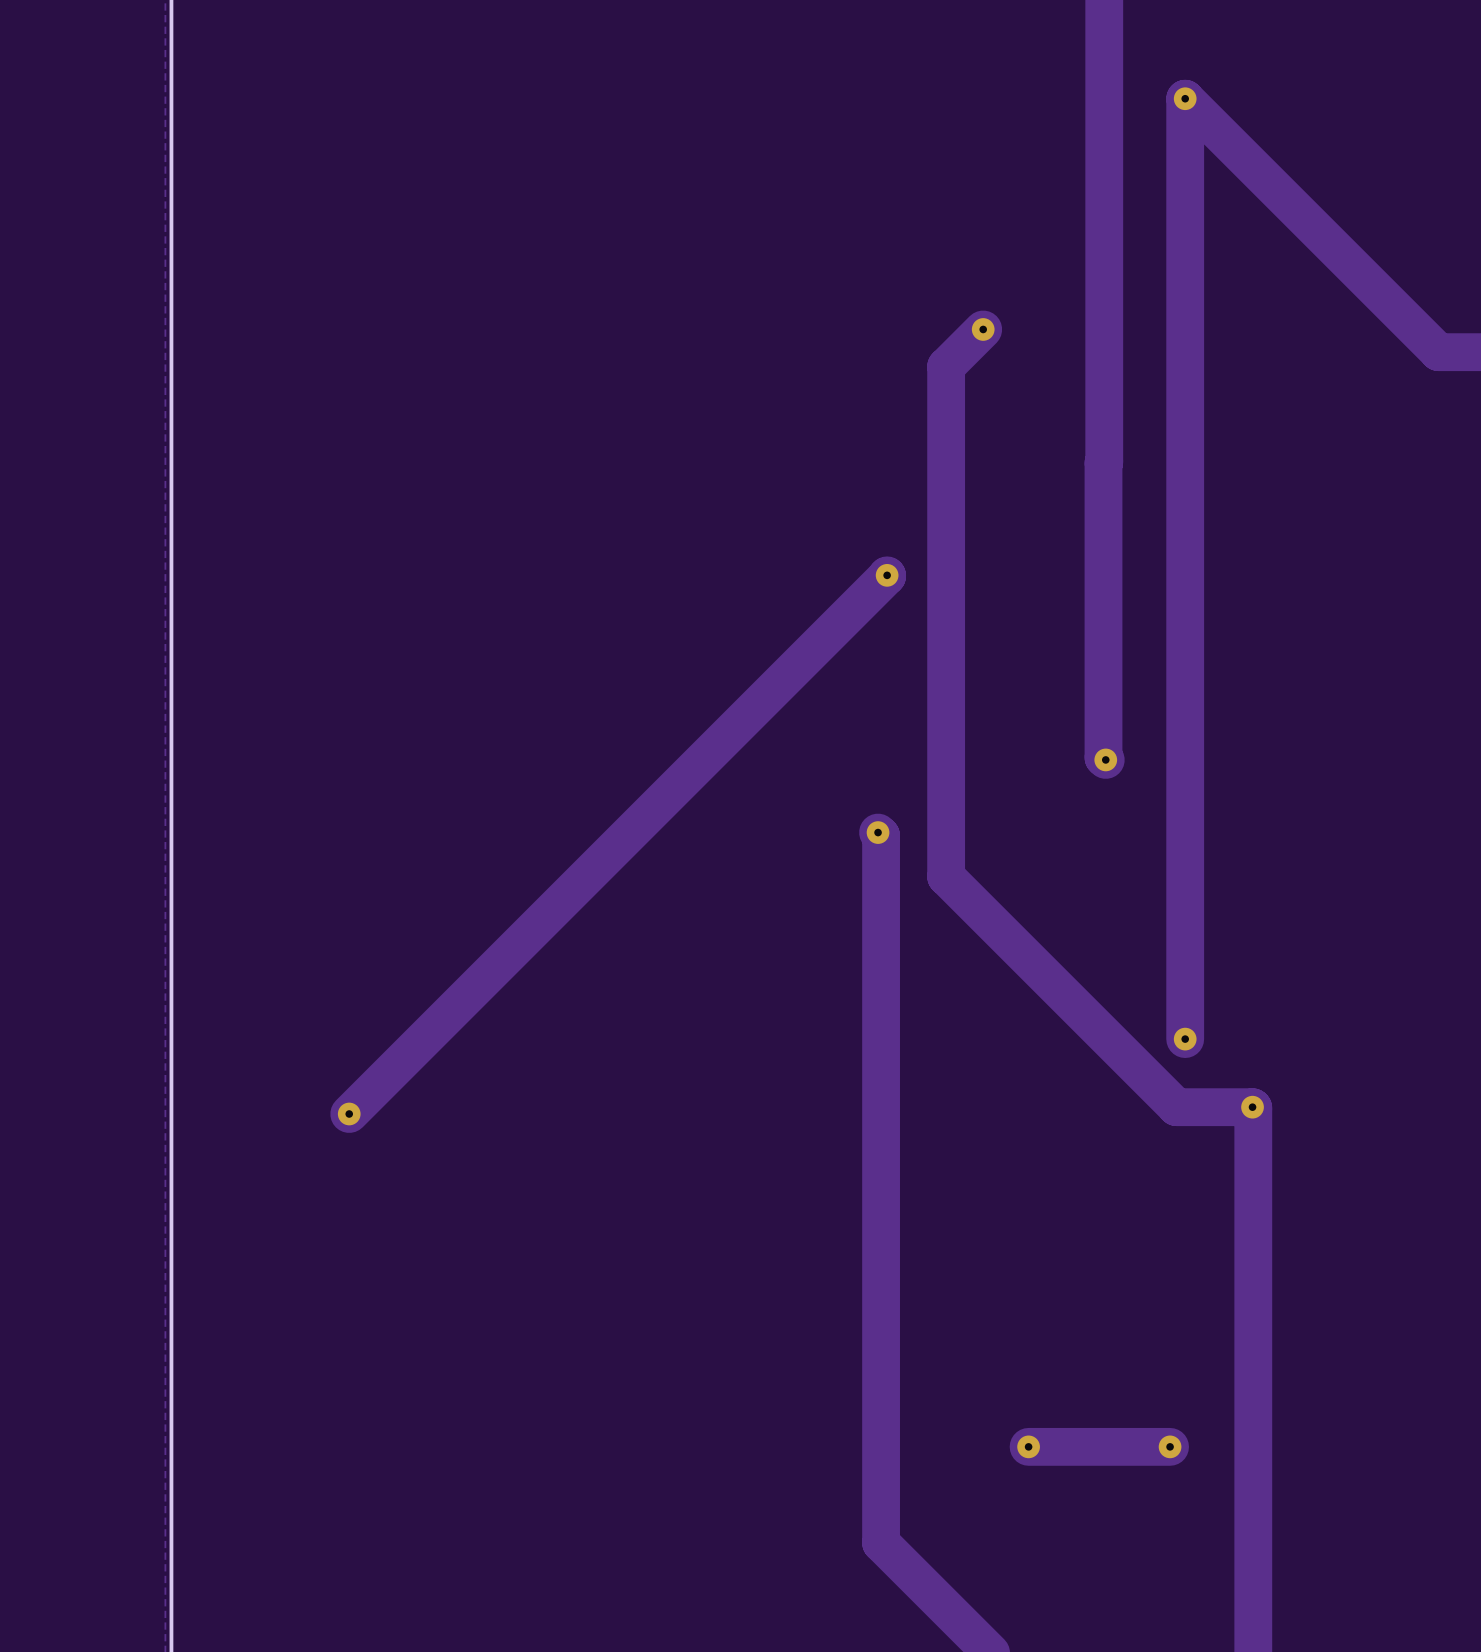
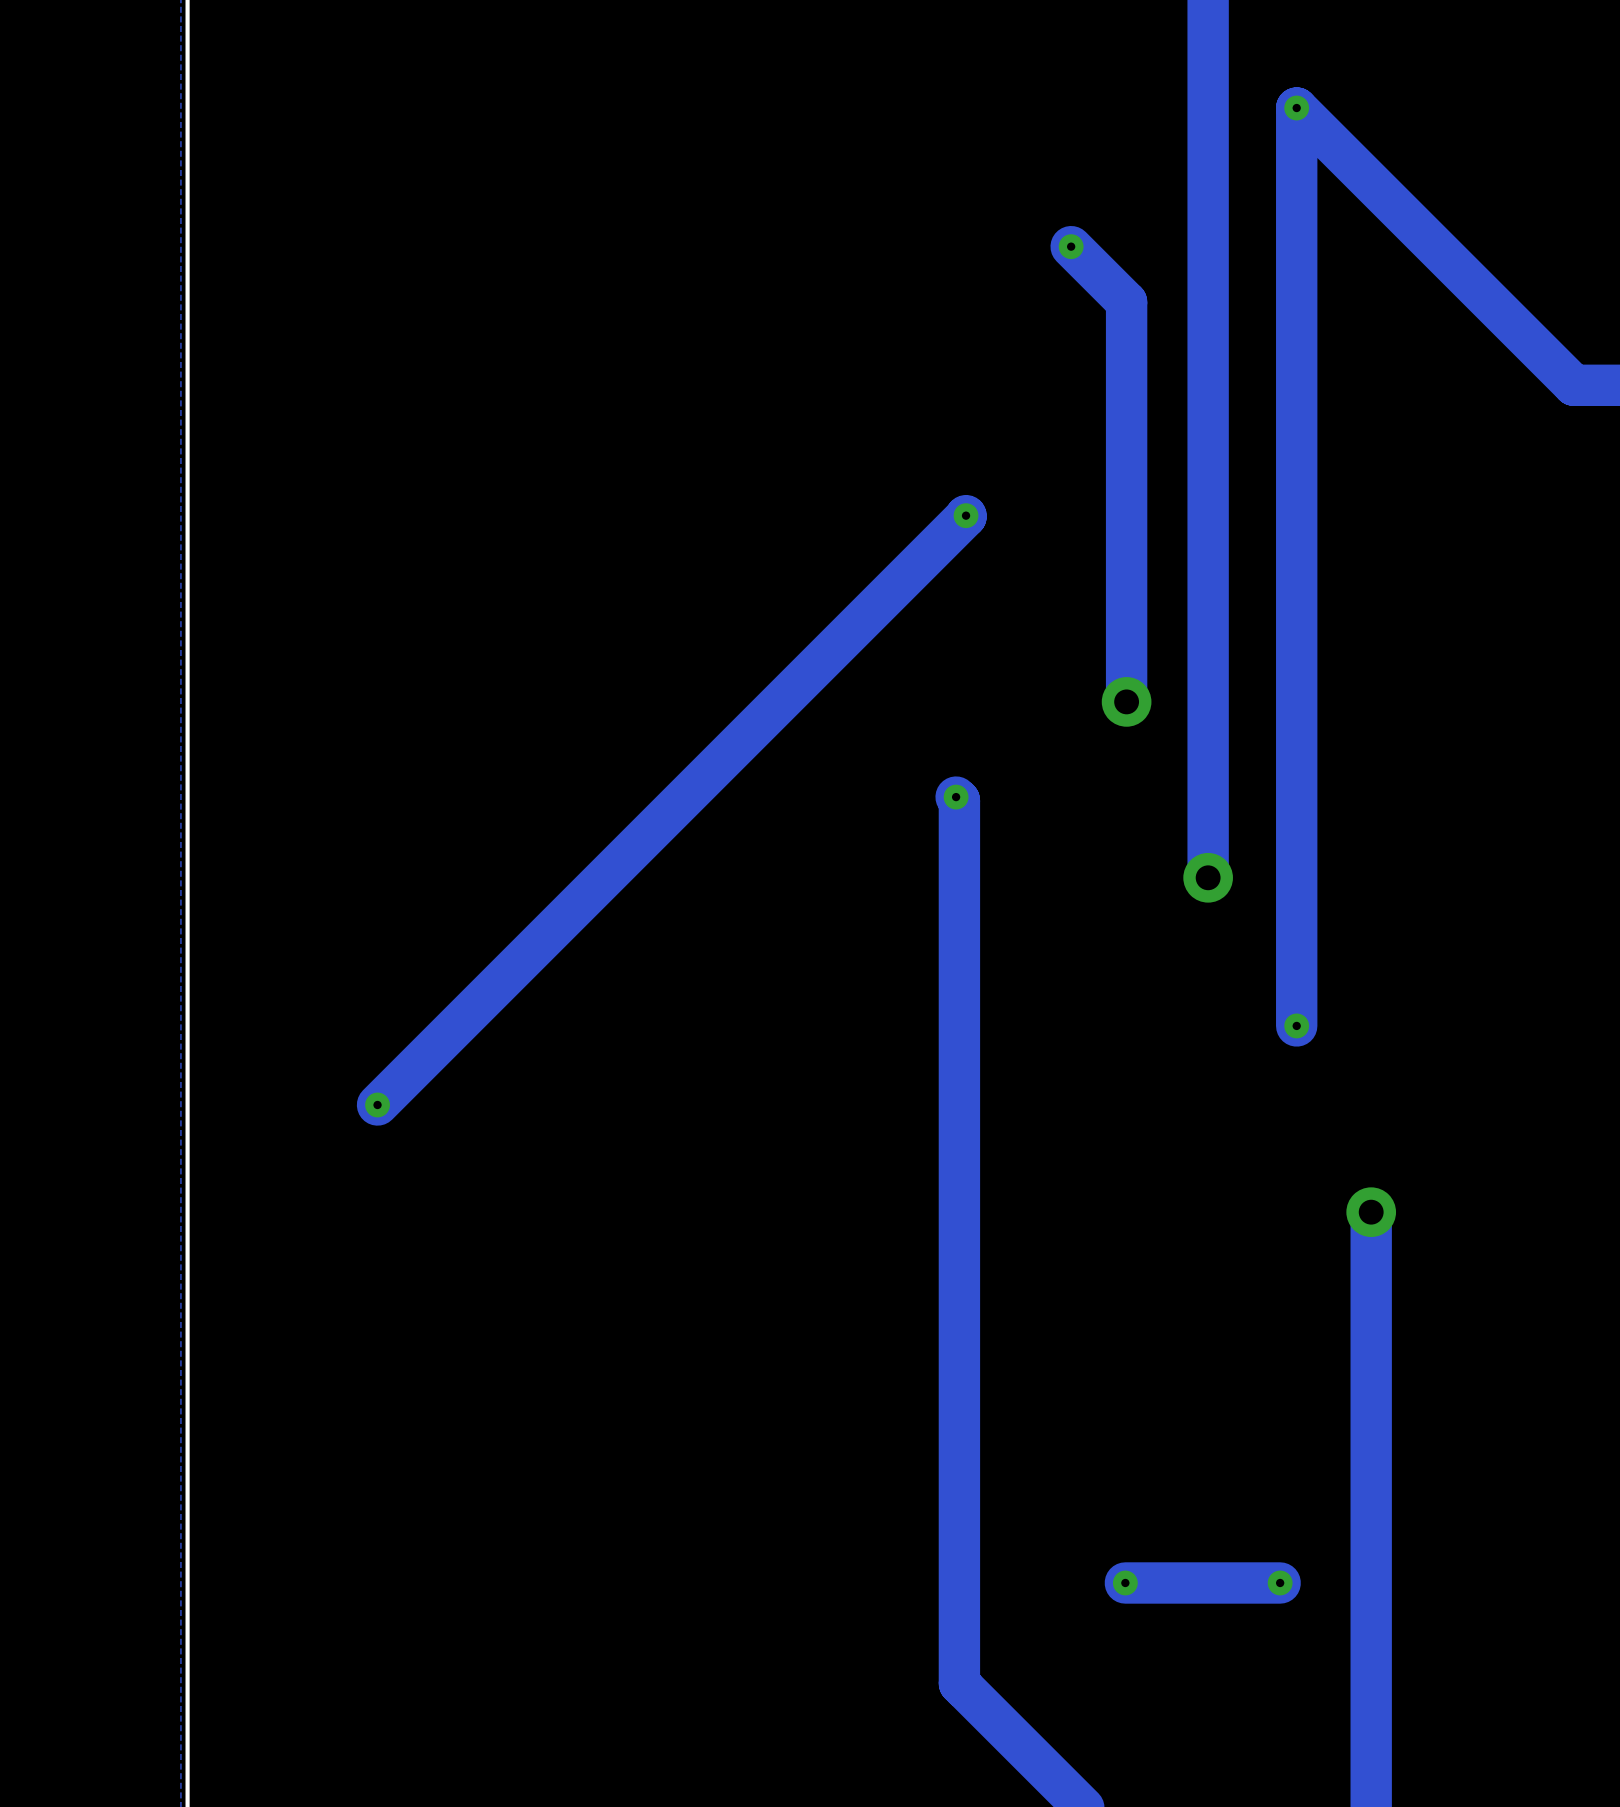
track: none -> (1071, 246) (1126, 302) (1126, 701)
via: none -> (1071, 246)
track: (983, 329) (946, 366) (946, 876) (1176, 1107) (1252, 1107) -> none
via: (983, 329) -> none
track: (1103, 462) (1103, 757) (1105, 759) -> (1208, 505) (1208, 877)
via: none -> (966, 515)
via: (887, 575) -> none
track: (887, 576) (349, 1113) -> (966, 516) (377, 1104)
via: none -> (1126, 701)
via: none -> (956, 797)
via: (1105, 759) -> none
via: none -> (1208, 877)
track: (878, 832) (881, 835) (881, 1542) -> (956, 797) (959, 800) (959, 1683) (963, 1688)
via: (878, 832) -> none
track: (1185, 937) (1185, 1039) -> none
via: none -> (1296, 1025)
via: (1185, 1039) -> none
via size: [1241, 1095, 1264, 1119] -> [1346, 1187, 1397, 1238]
via position: (349, 1113) -> (377, 1104)

